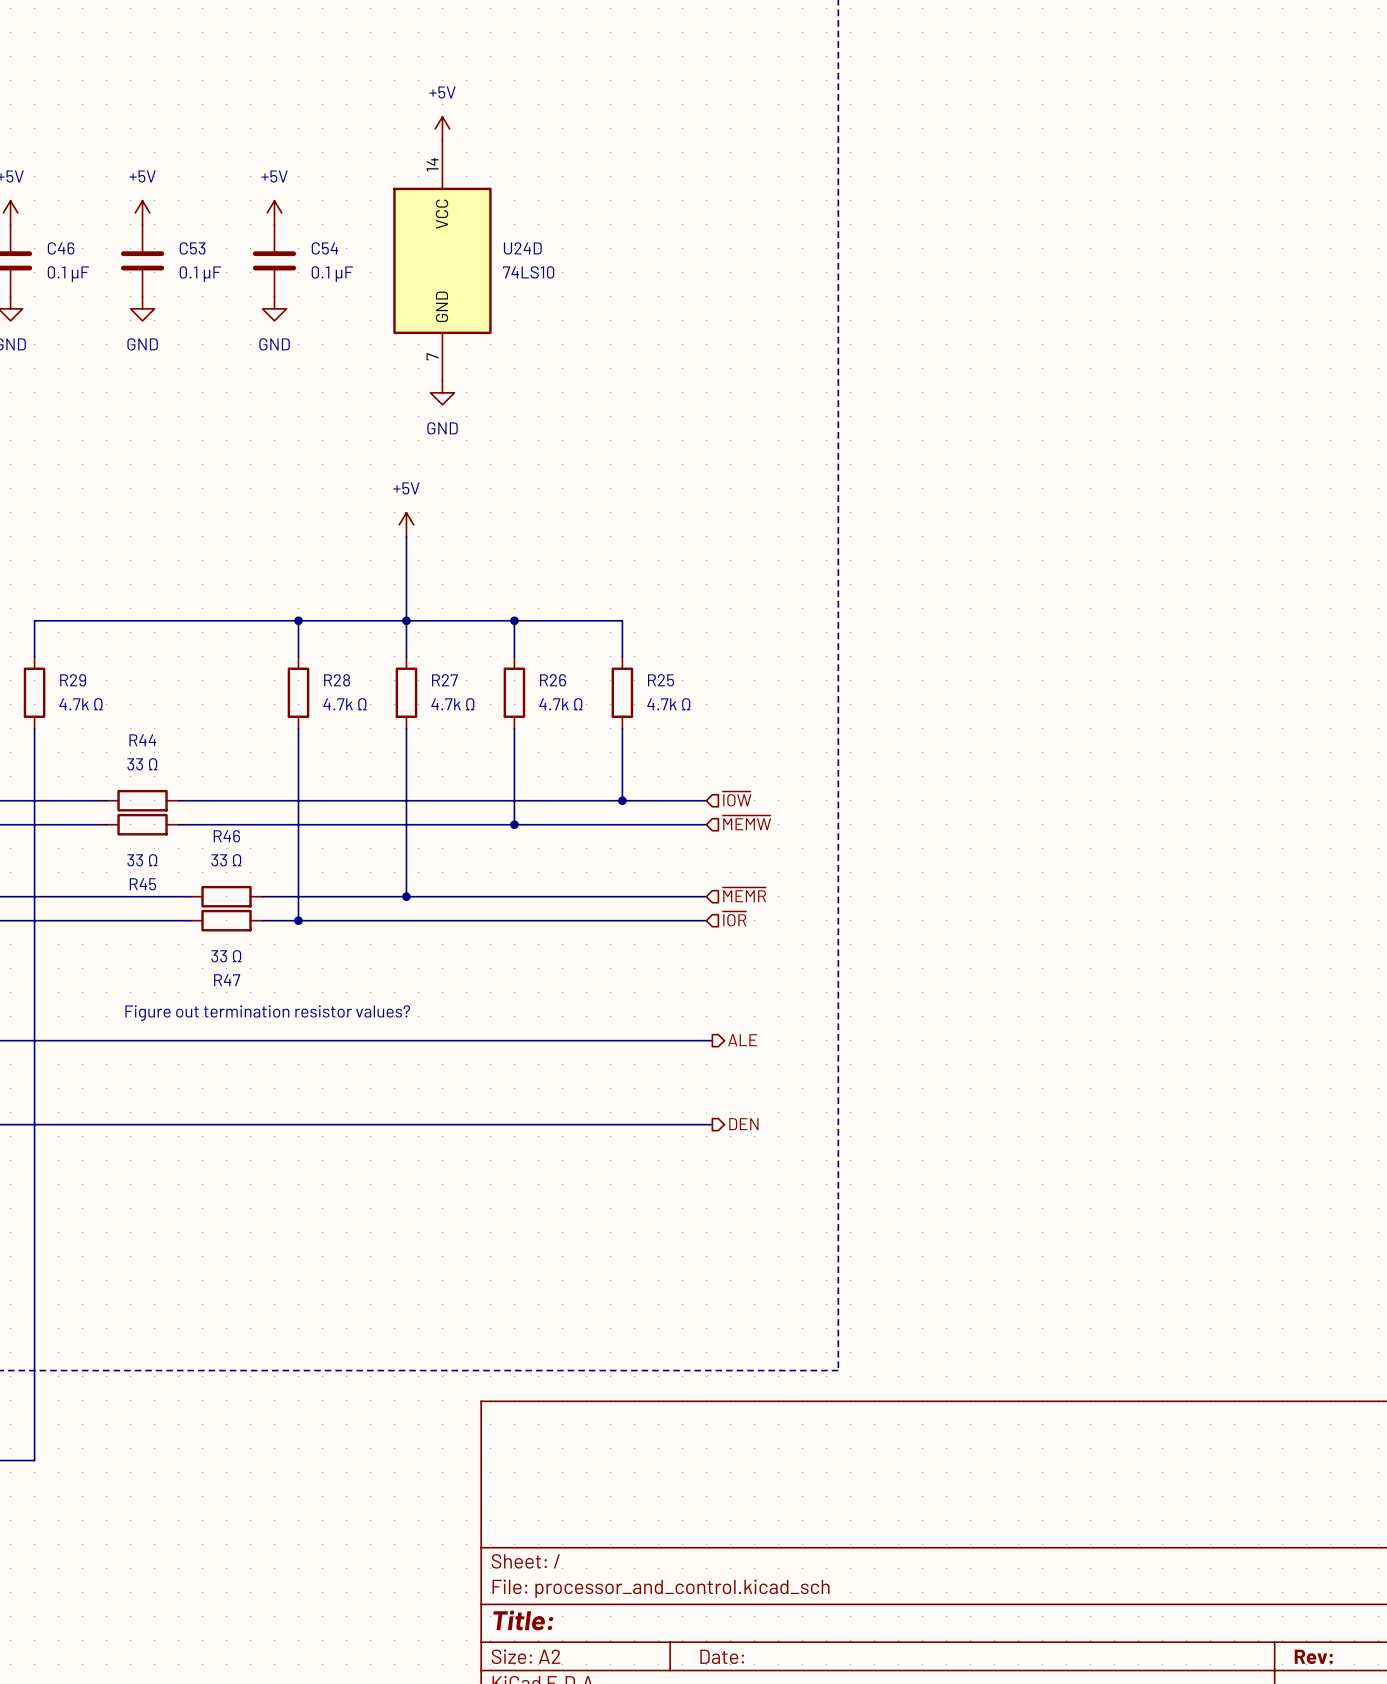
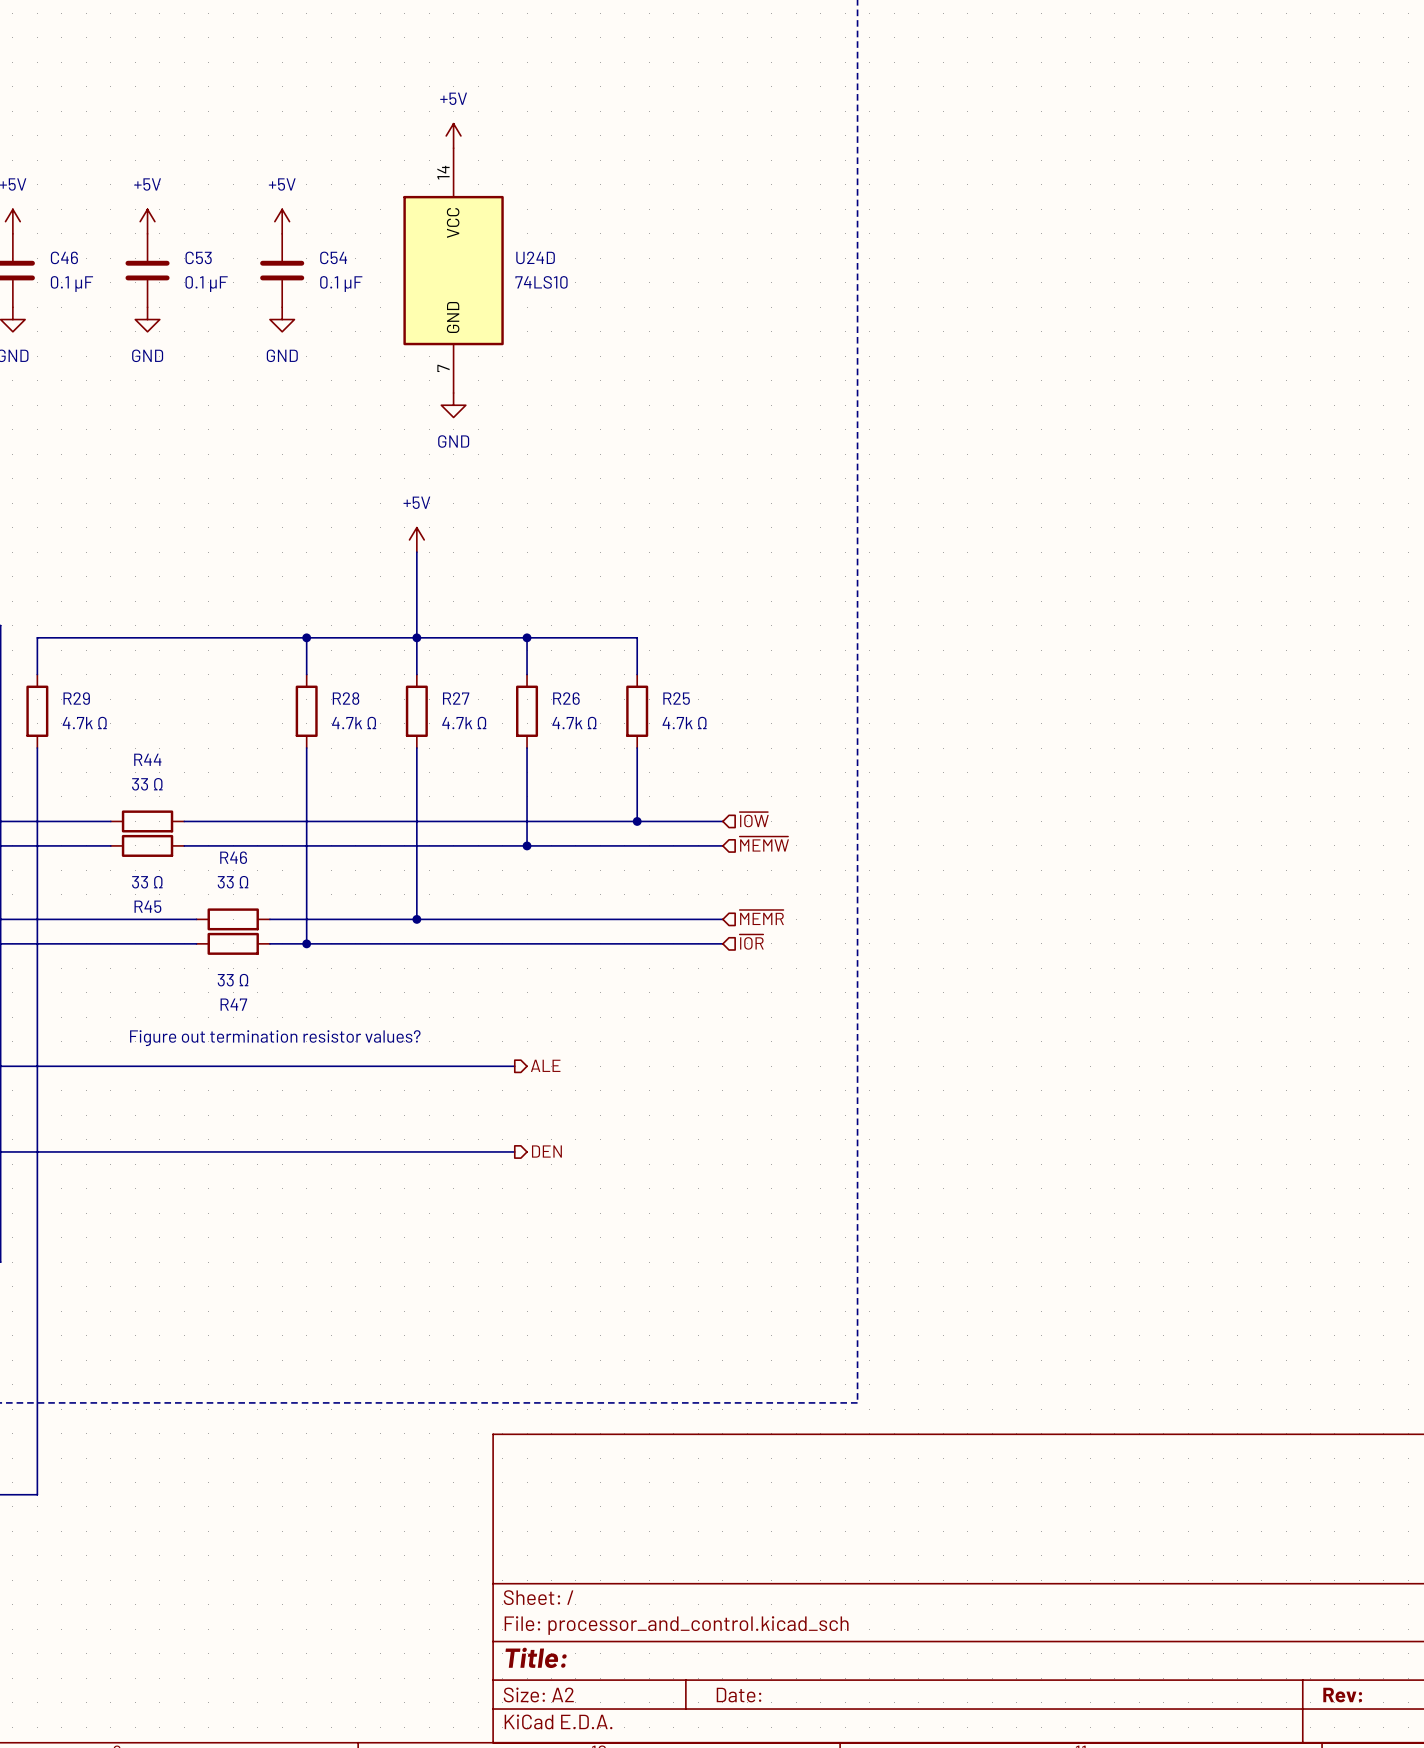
wire: (502, 1040) (712, 1040) -> none
hierarchical label position: ALE (742, 1040) -> ALE (545, 1065)
wire: (502, 1124) (712, 1124) -> none
hierarchical label position: DEN (743, 1124) -> DEN (546, 1151)

